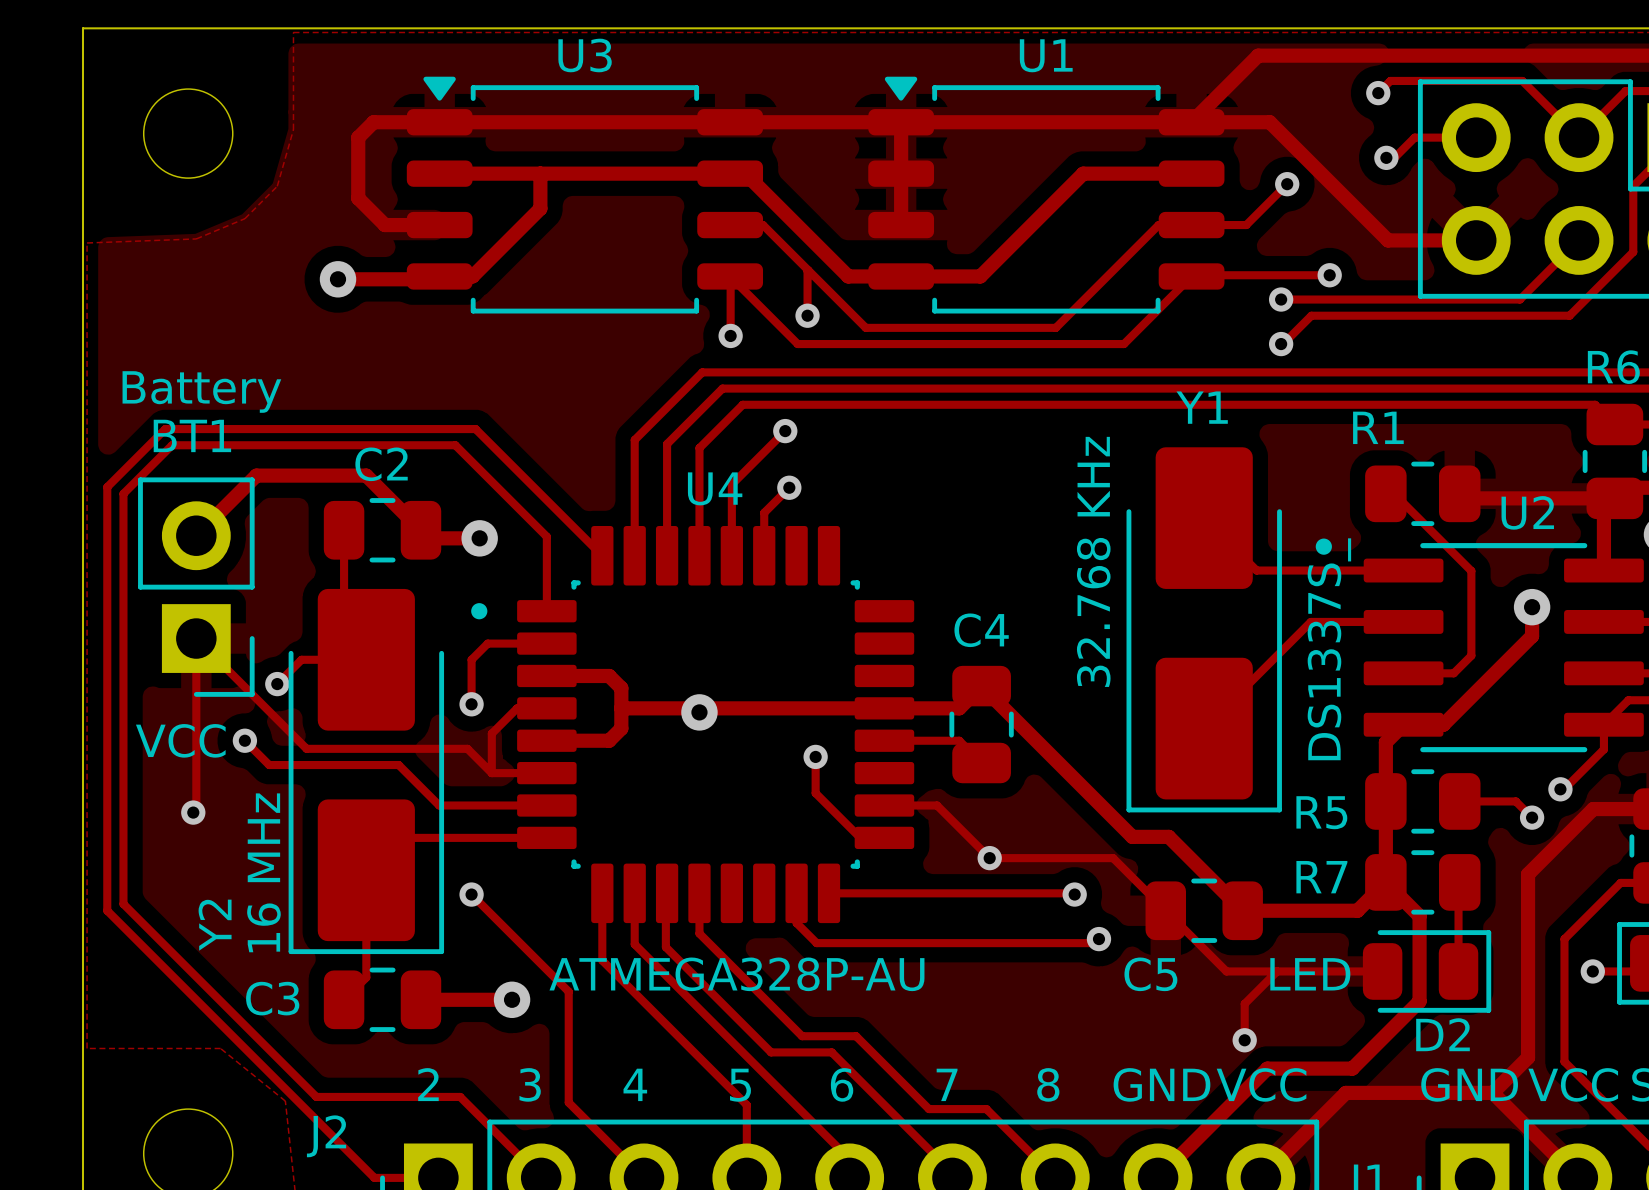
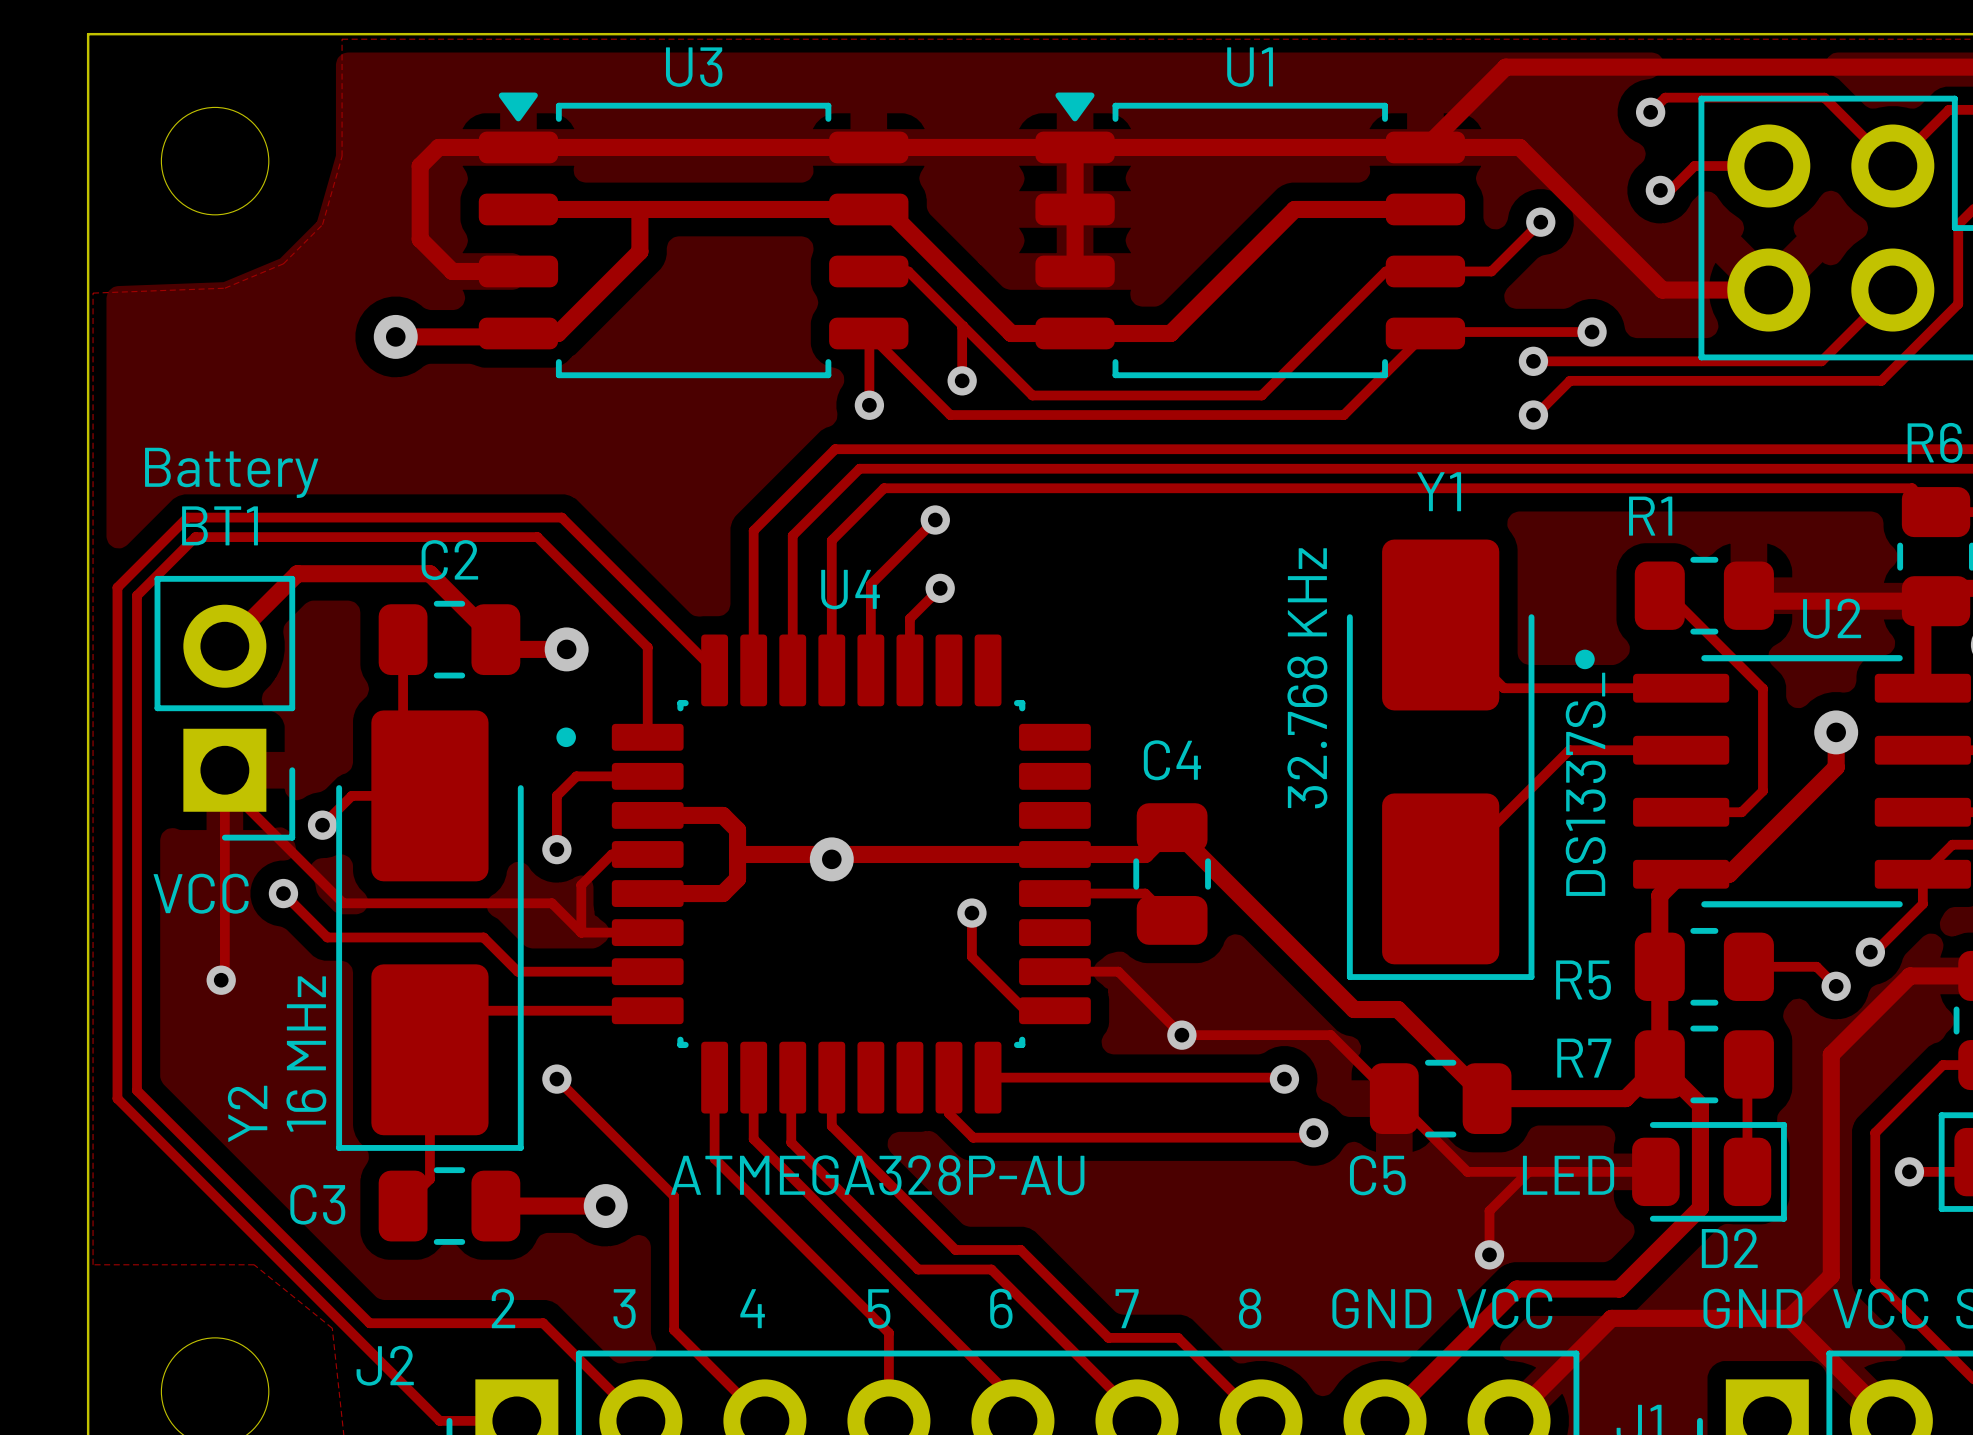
track: (196, 638) (306, 748) -> (224, 784) (343, 903) (357, 903)
track: (269, 765) (398, 765) (410, 777) -> (312, 922) (327, 937) (483, 937)

